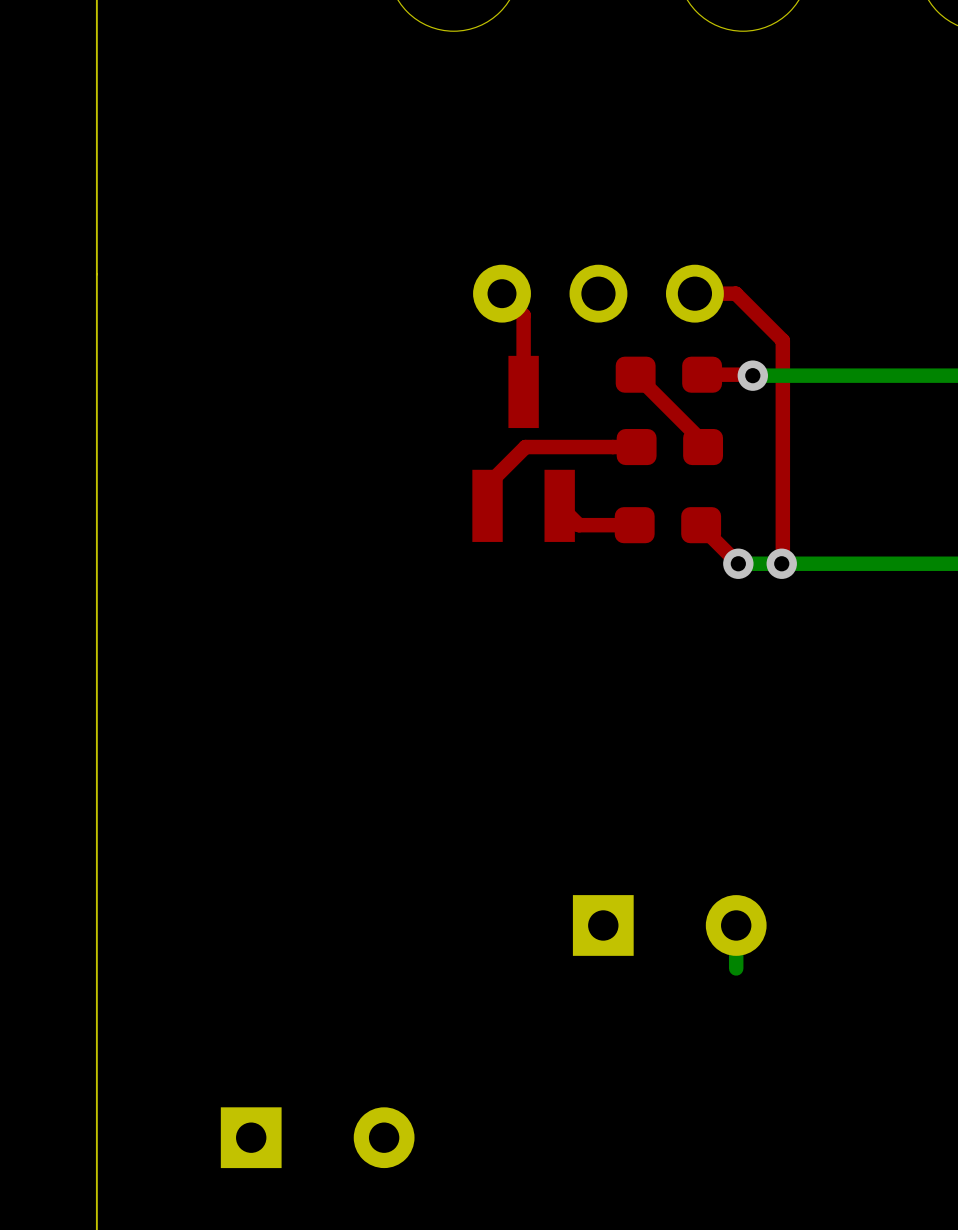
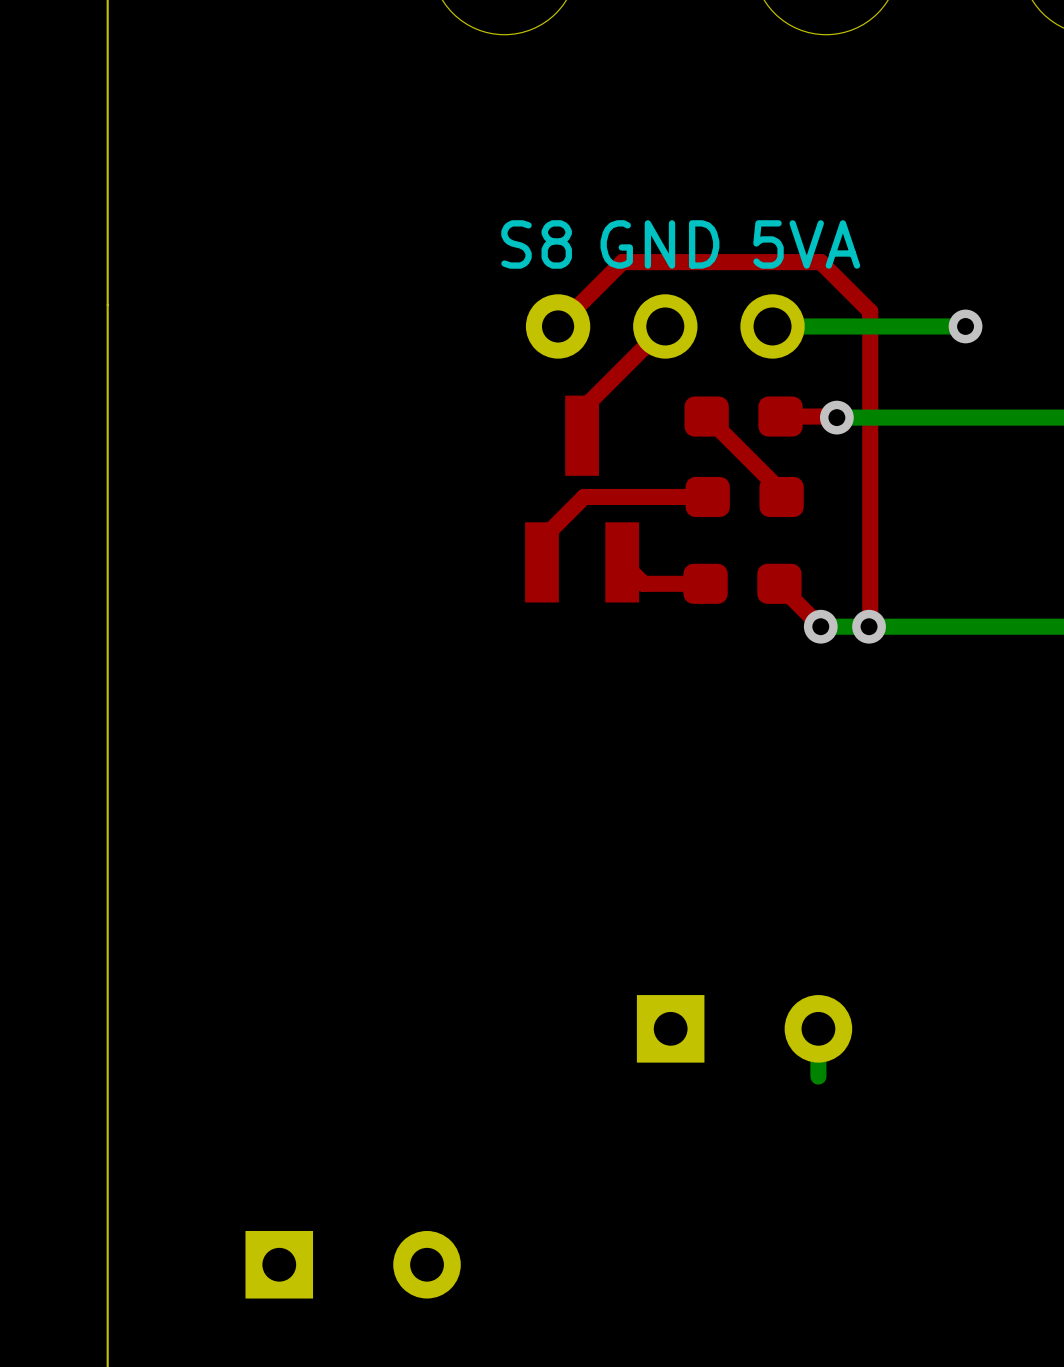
text: none -> S8 (536, 244)
text: none -> GND (659, 244)
text: none -> 5VA (806, 244)
top track: (502, 293) (523, 315) (523, 368) -> (665, 326) (582, 409)
top track: (694, 293) (735, 293) (782, 340) -> (558, 326) (622, 262) (820, 262) (870, 311) (870, 378)
bottom track: none -> (965, 326) (772, 326)
via: none -> (965, 326)

